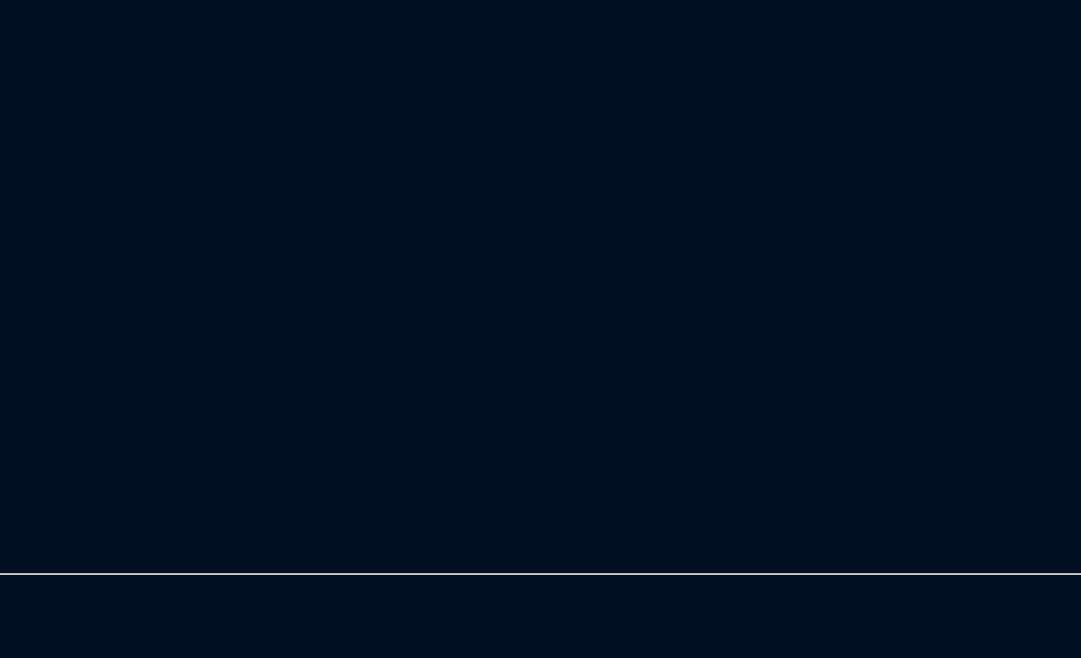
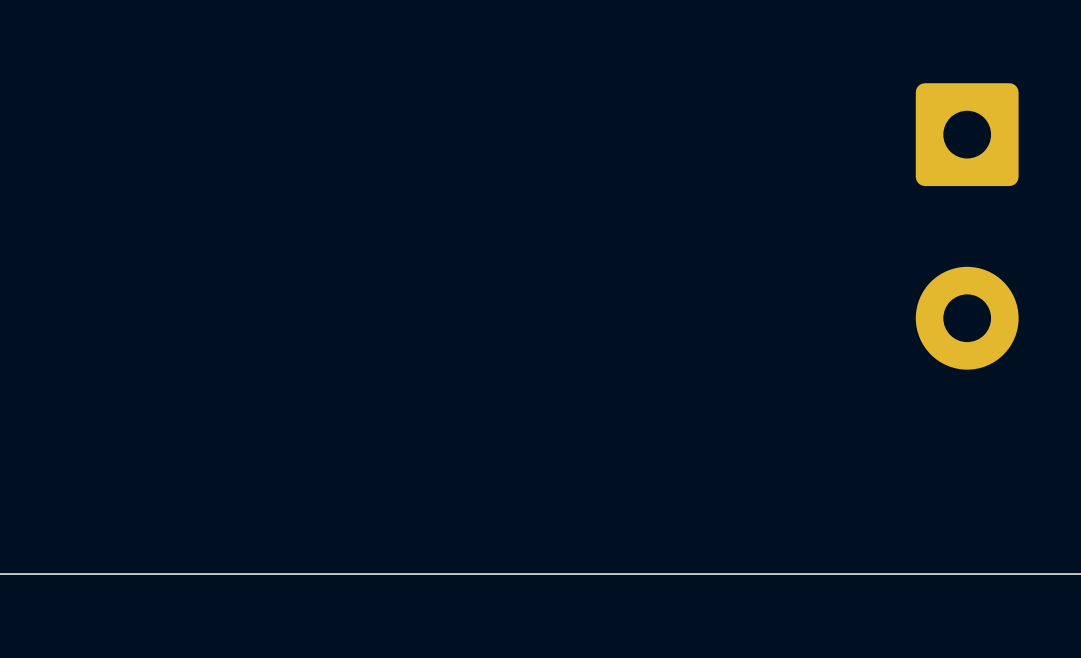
part: none -> (967, 226)

